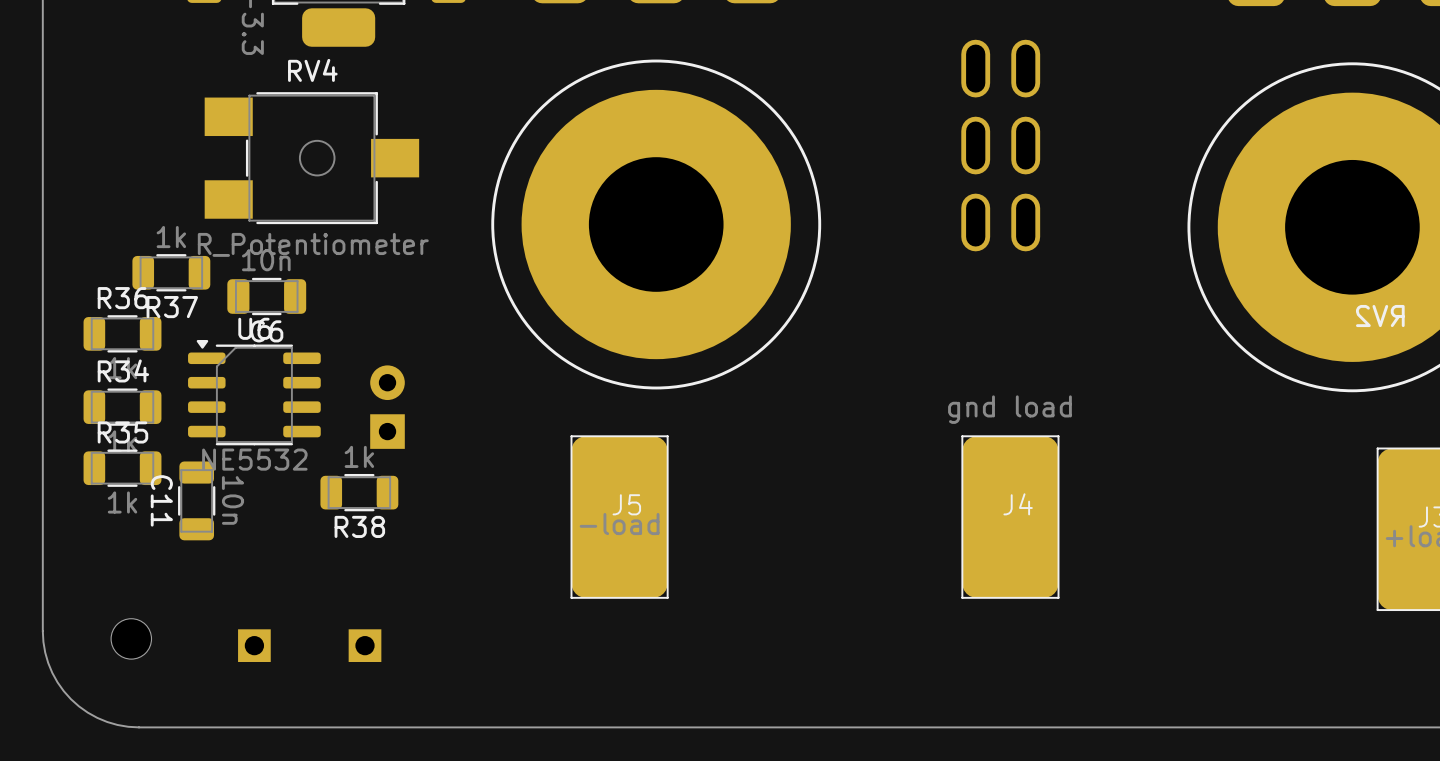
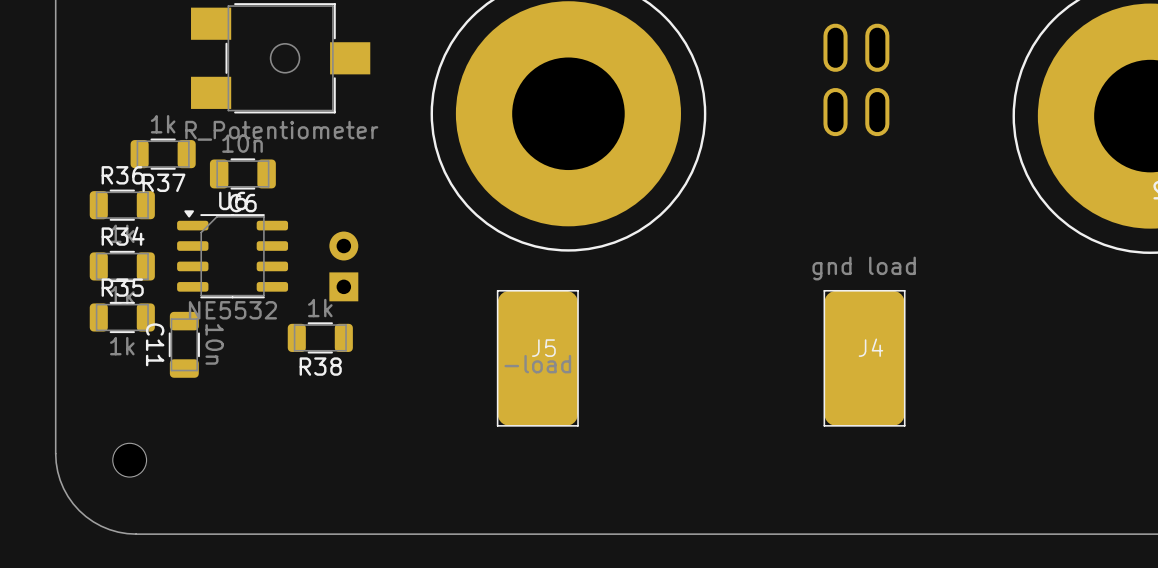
part: (254, 645) -> none
part: (365, 645) -> none

